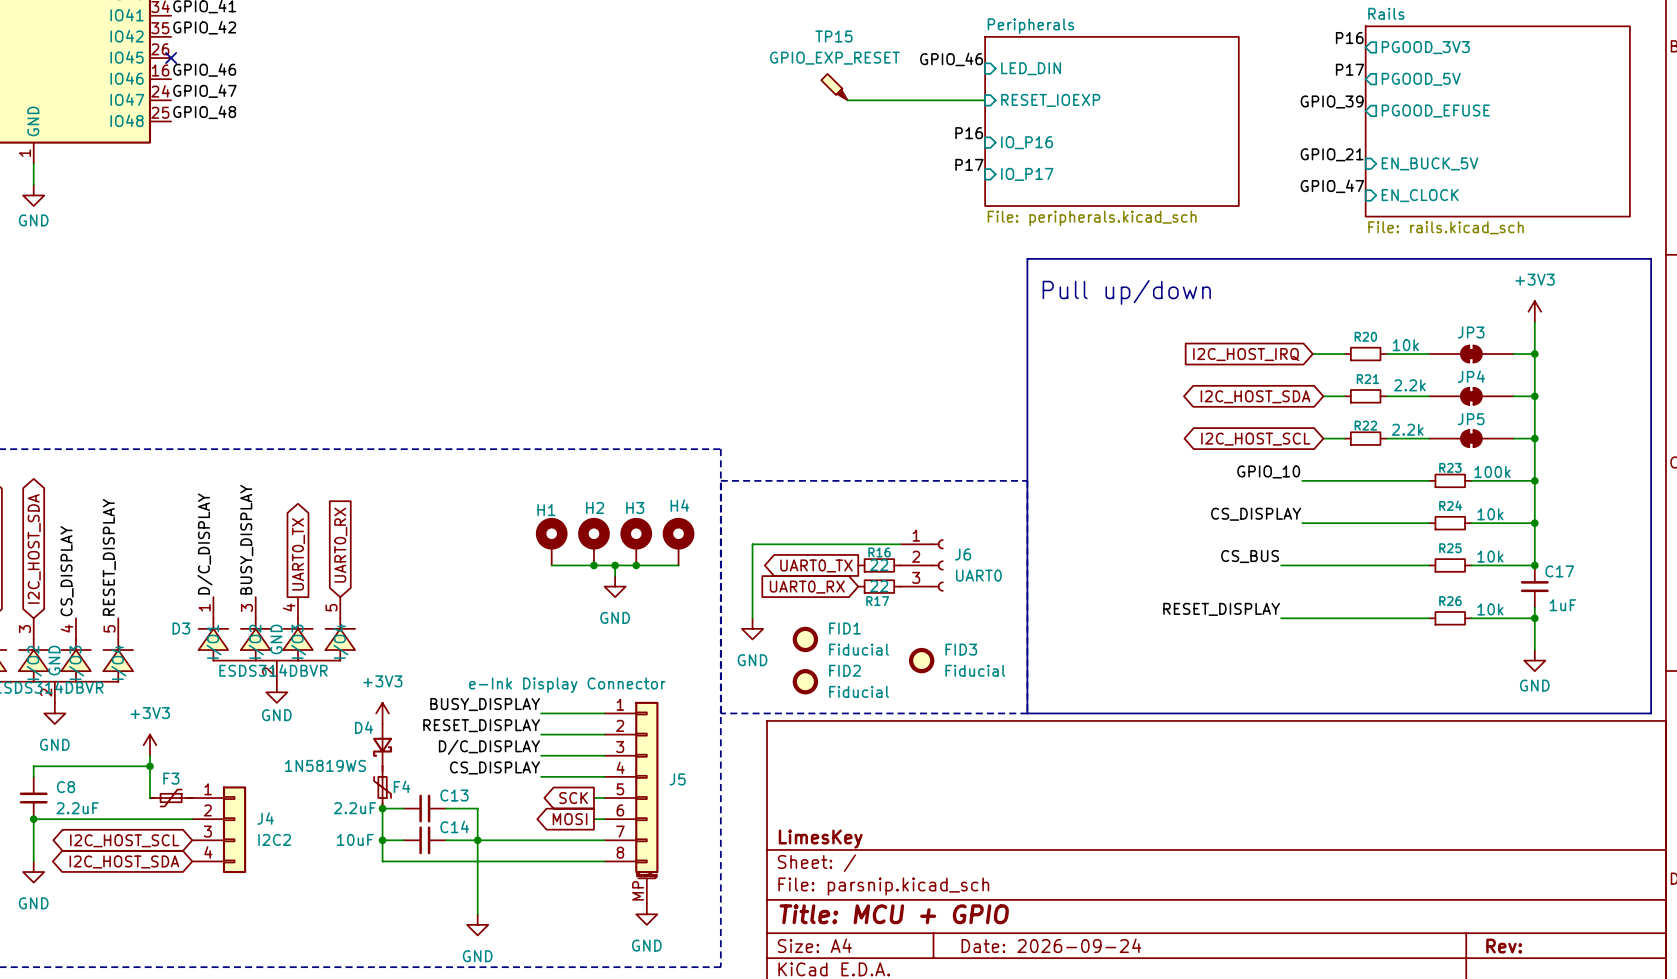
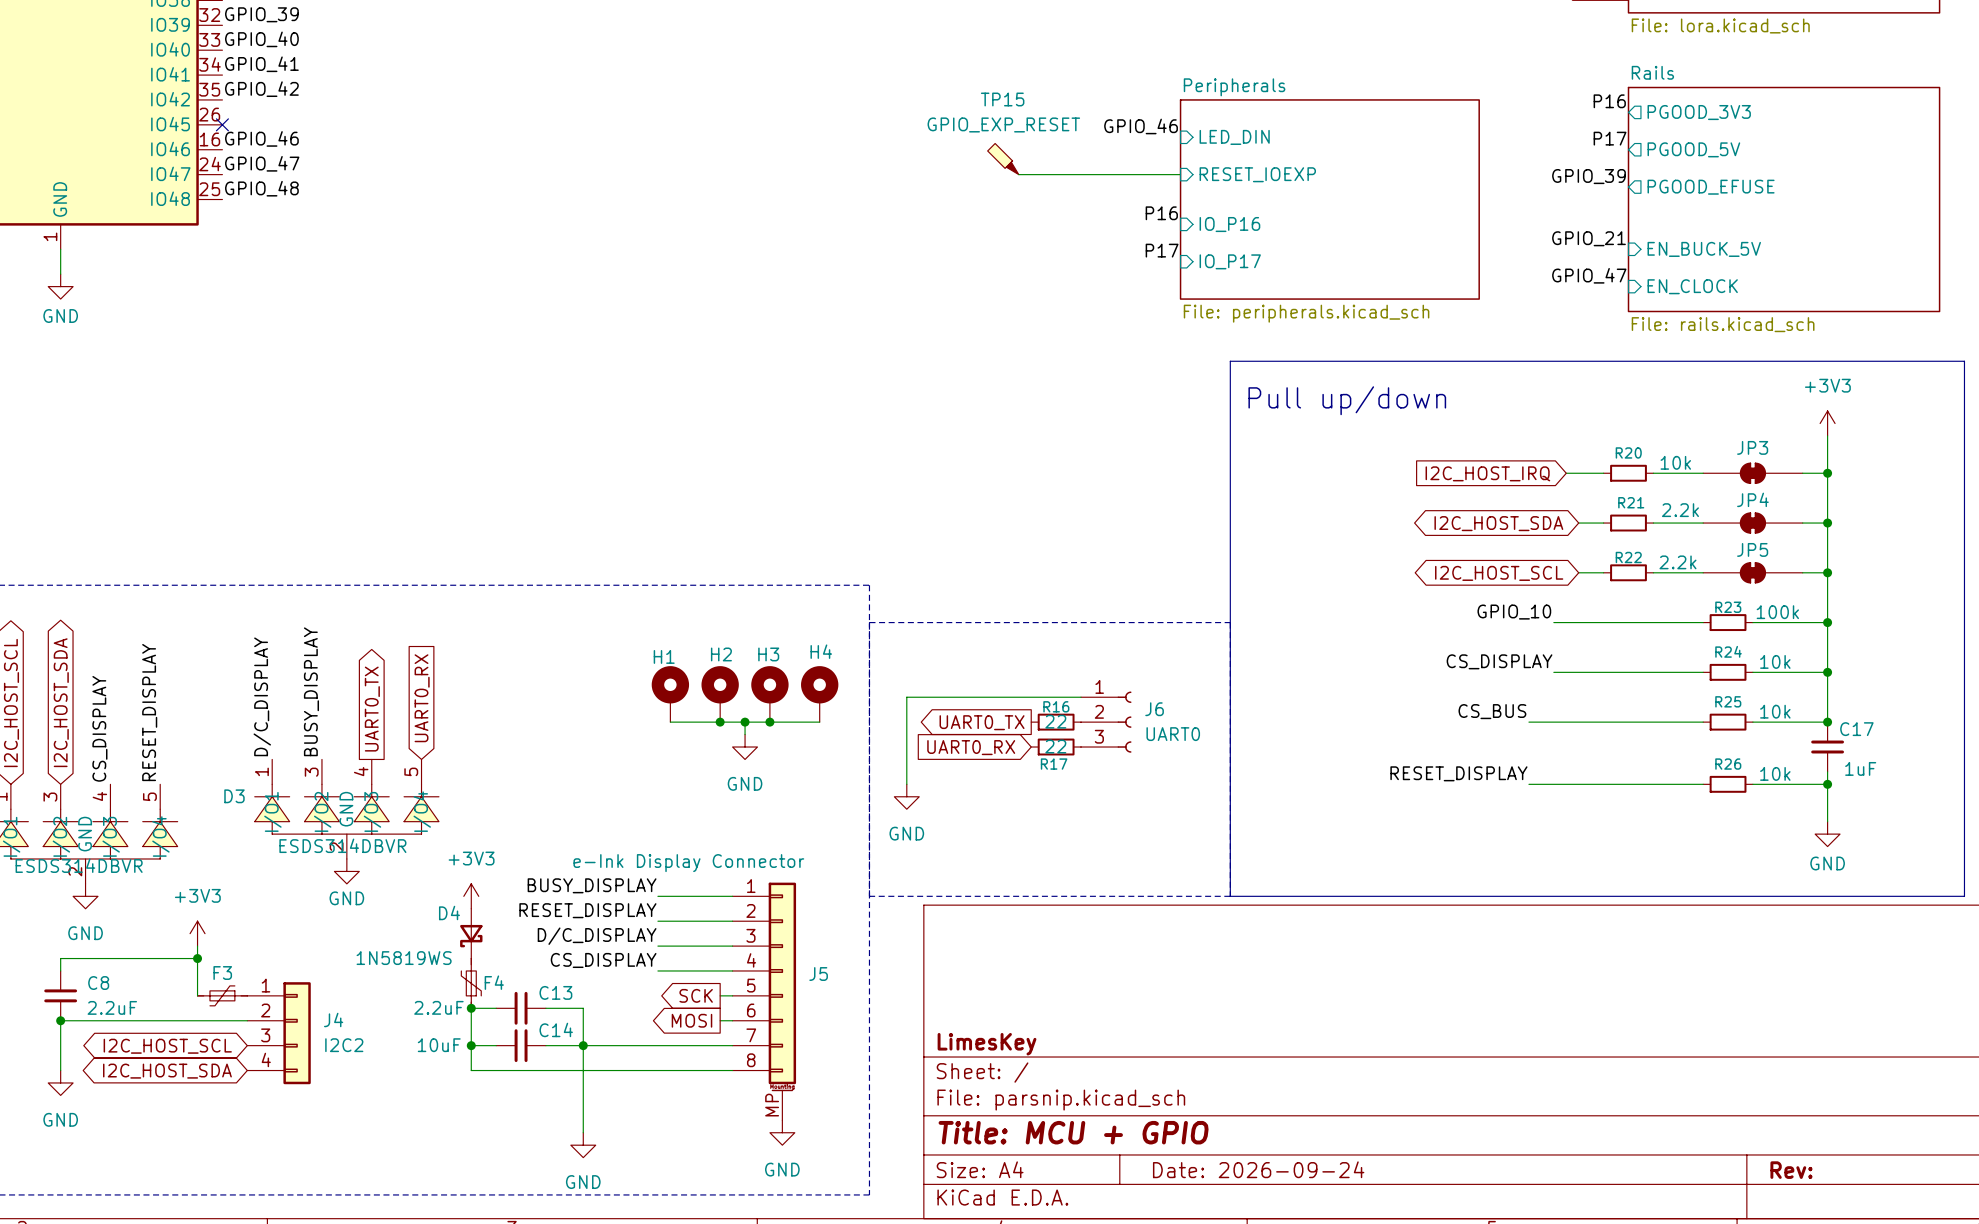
FID1: Fiducial (805, 639) -> none
FID3: Fiducial (921, 660) -> none
FID2: Fiducial (805, 681) -> none

